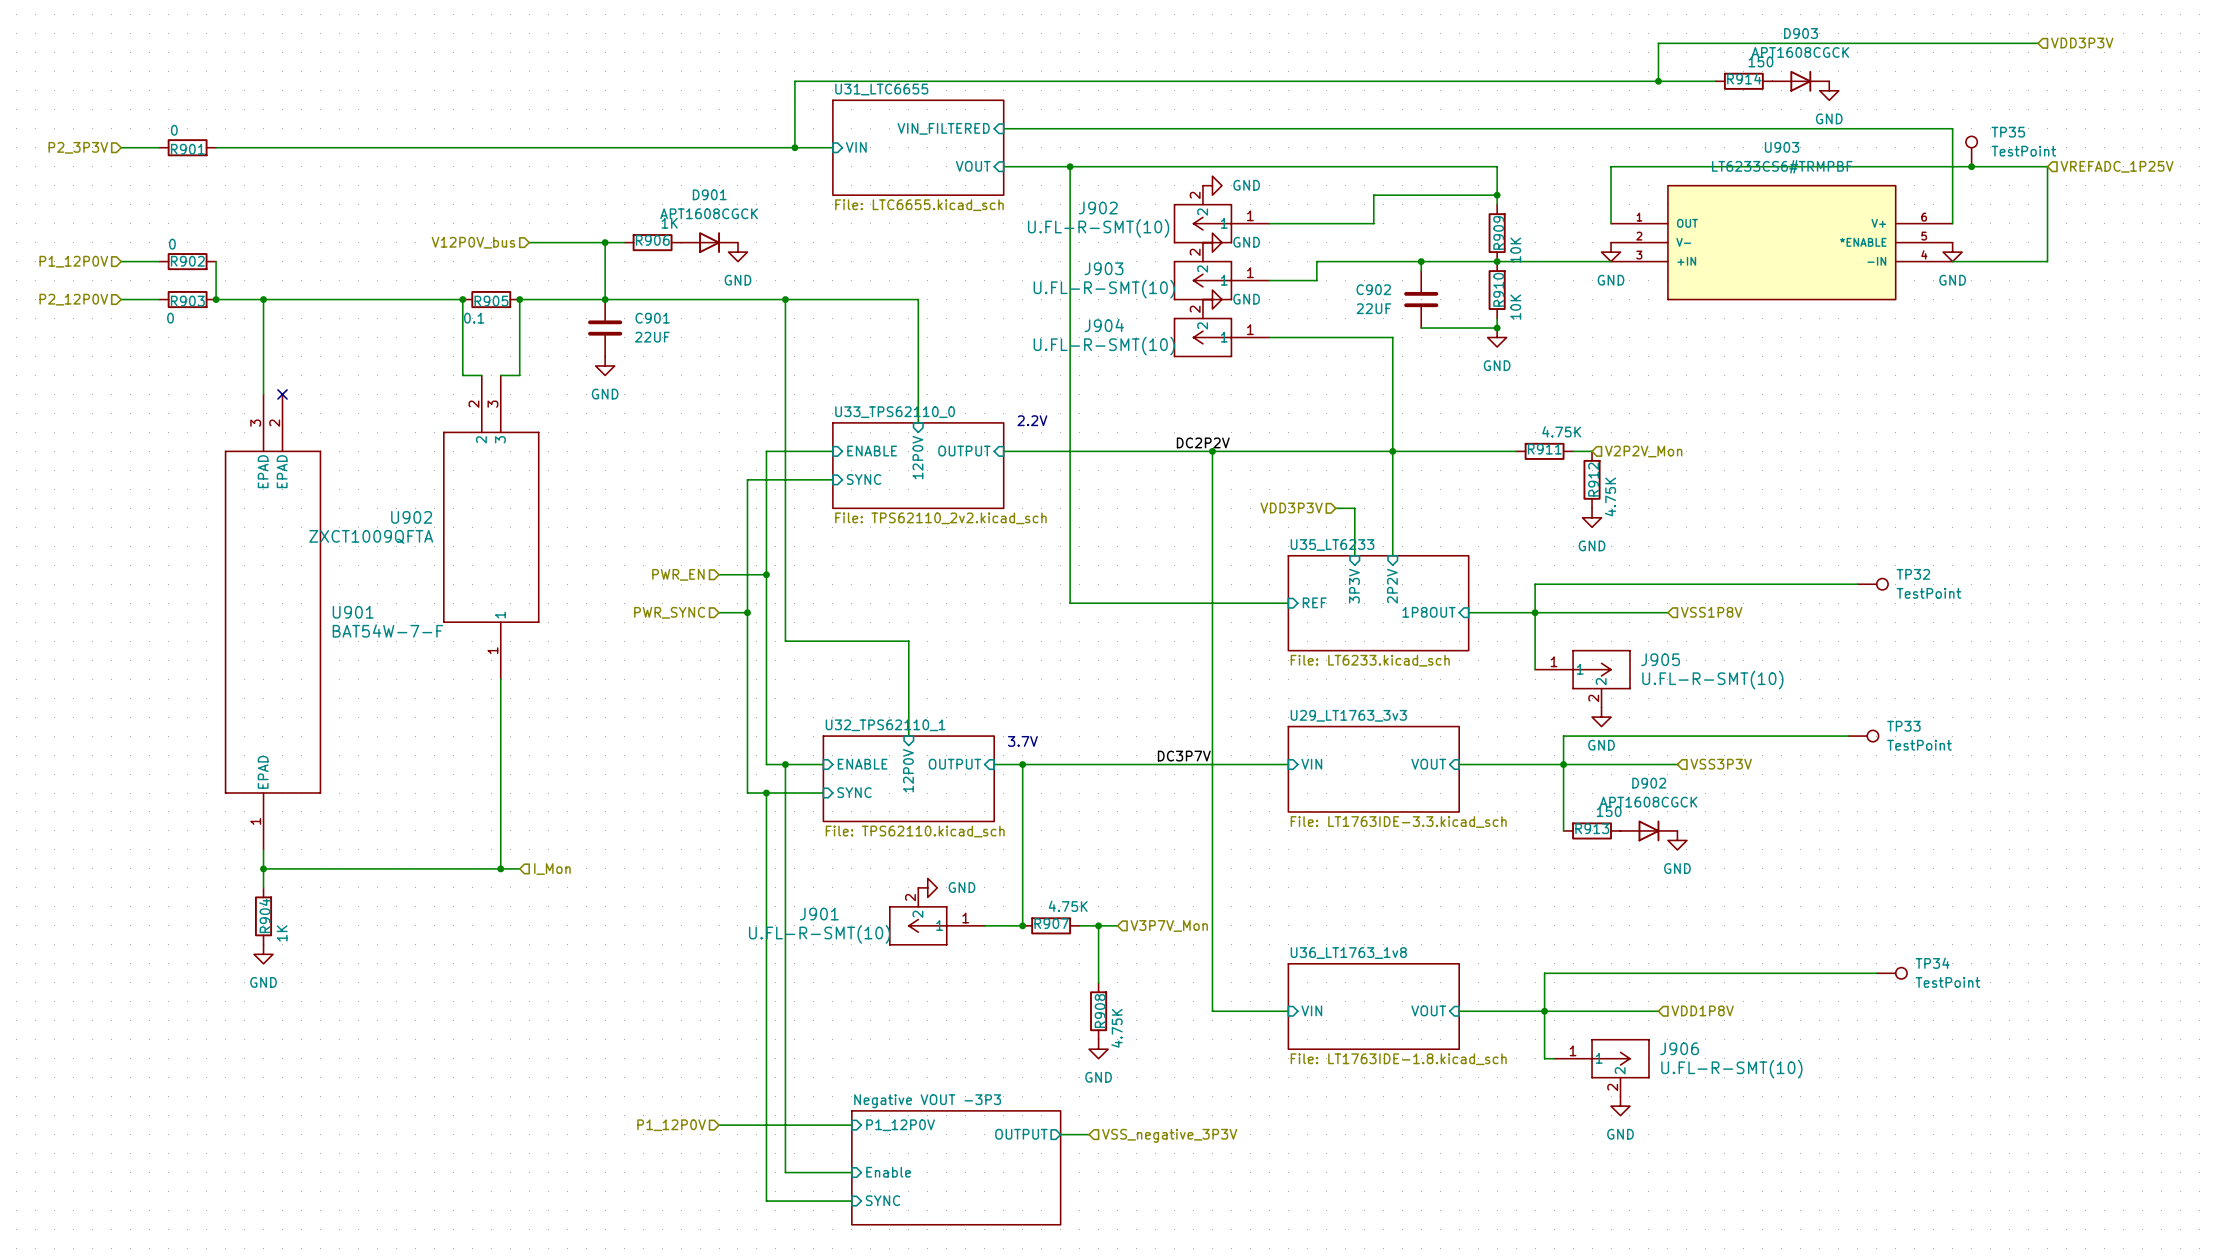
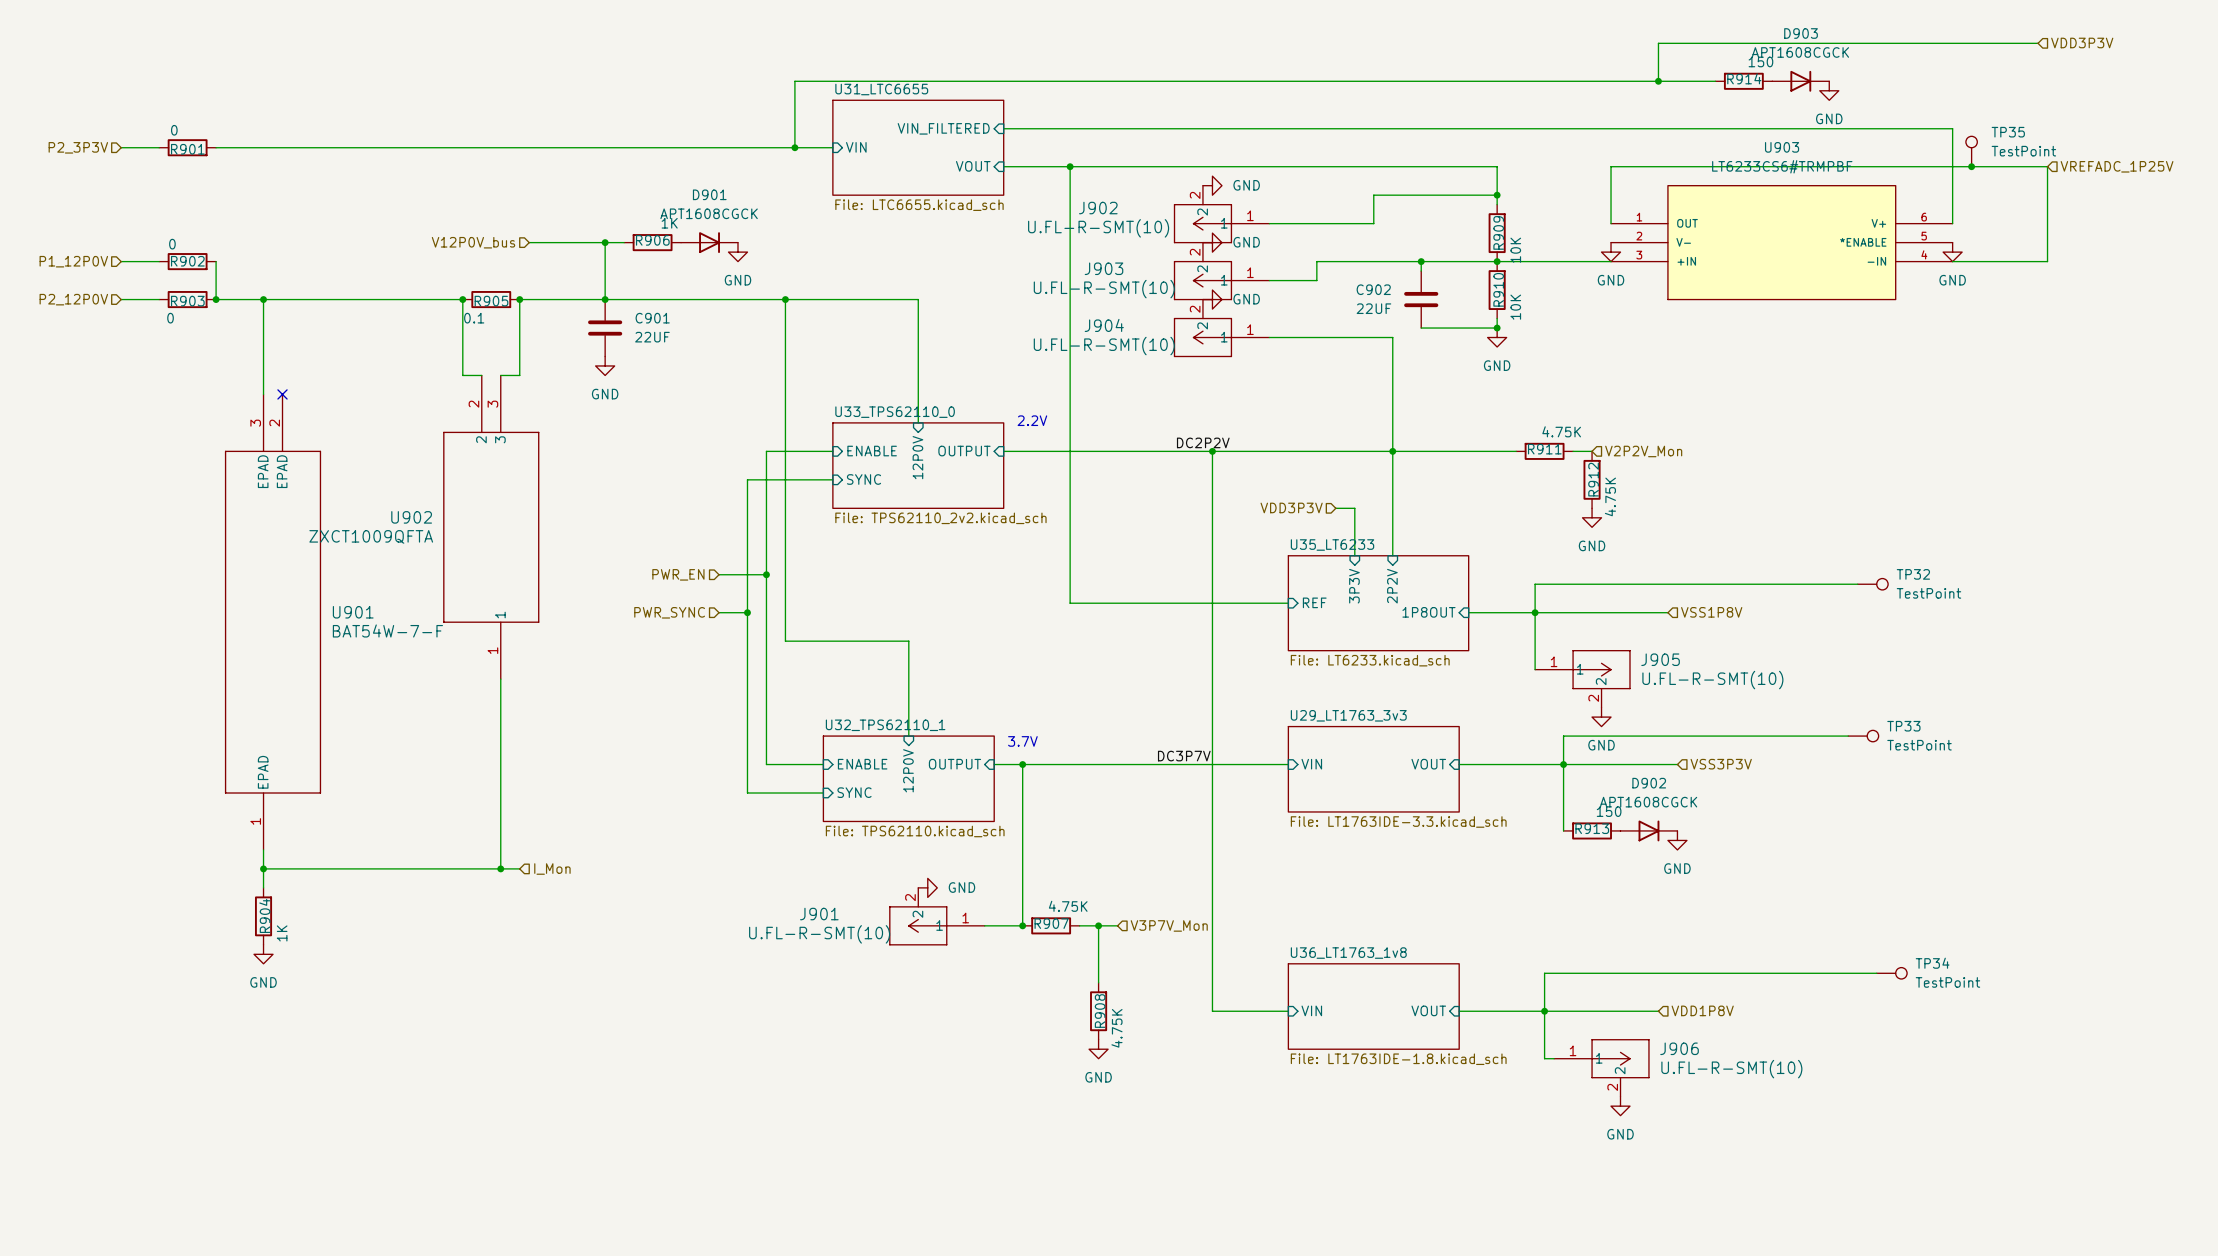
wire: (785, 764) (785, 1172) (851, 1172) -> none
junction: (785, 764) -> none
wire: (766, 793) (766, 1201) (851, 1201) -> none
junction: (766, 793) -> none
hierarchical label: P1_12P0V (671, 1125) -> none
wire: (719, 1125) (851, 1125) -> none
sheet pin: P1_12P0V (900, 1125) -> none
sheet pin: OUTPUT (1021, 1134) -> none
wire: (1060, 1134) (1089, 1134) -> none
hierarchical label: VSS_negative_3P3V (1169, 1135) -> none
sheet Negative VOUT -3P3: (956, 1167) -> none
sheet pin: Enable (888, 1172) -> none
sheet pin: SYNC (882, 1200) -> none

